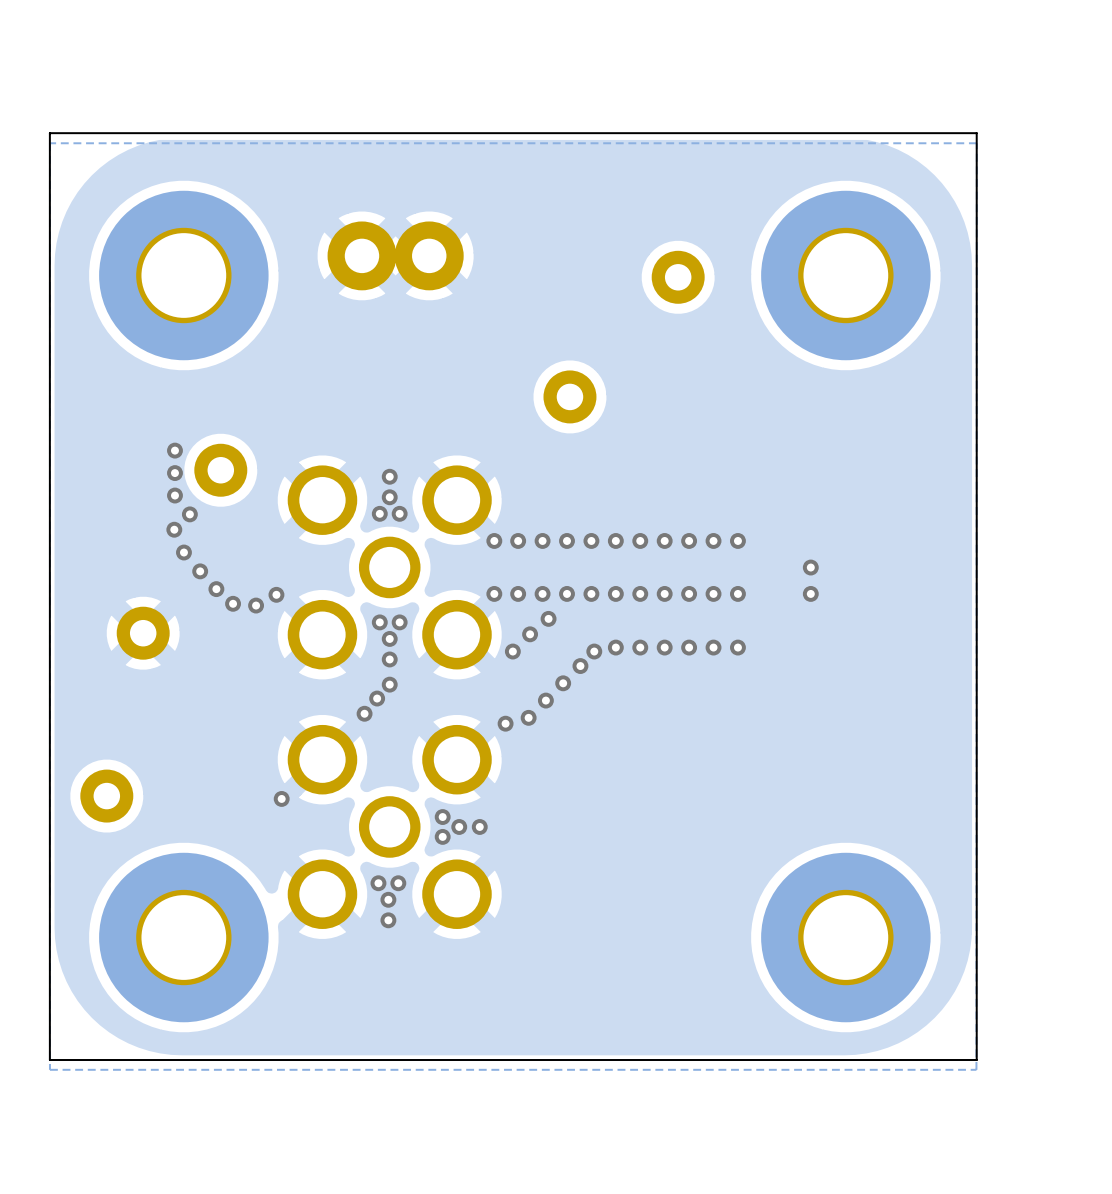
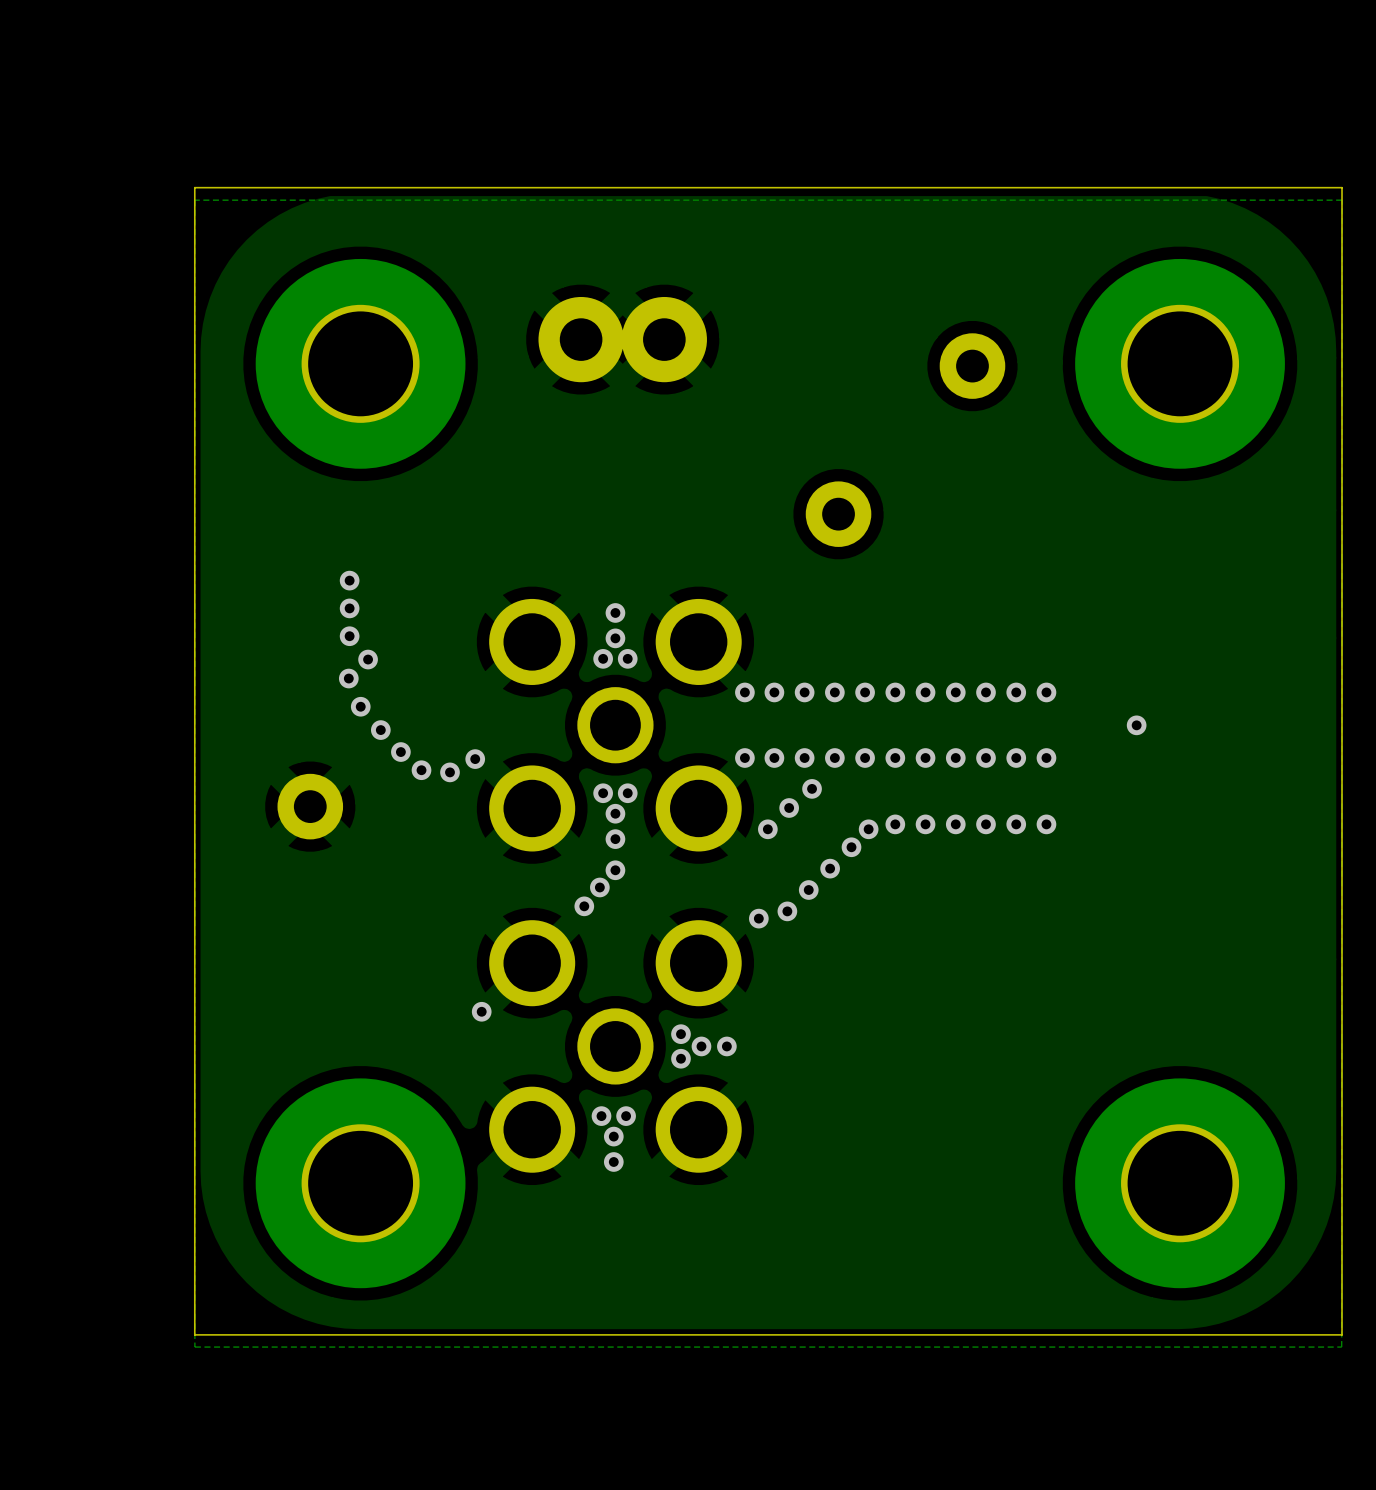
part: (220, 470) -> none
via: (810, 593) -> none
part: (106, 796) -> none

